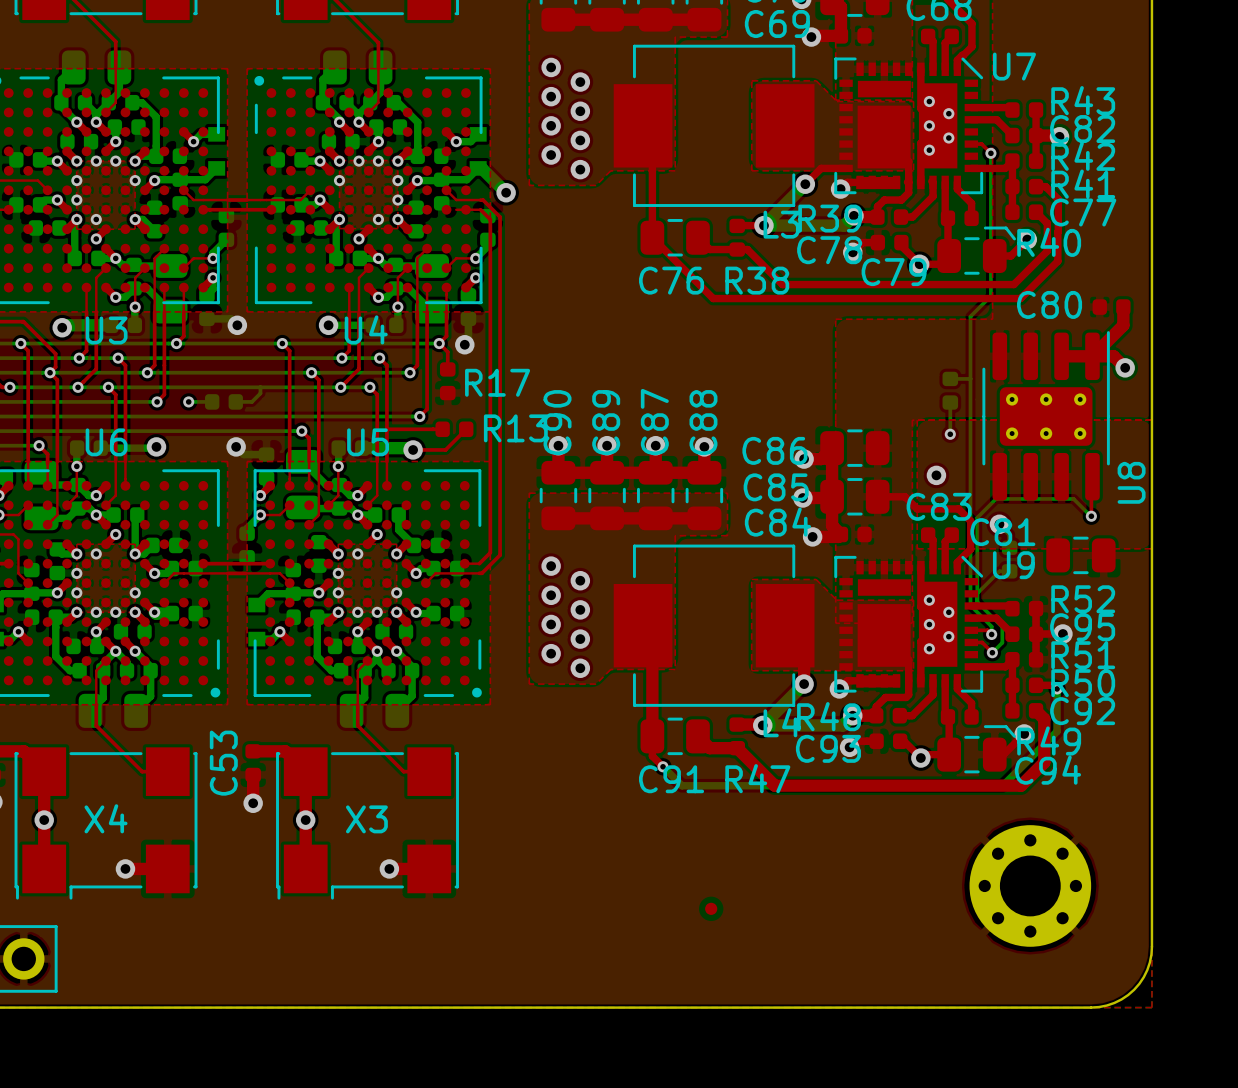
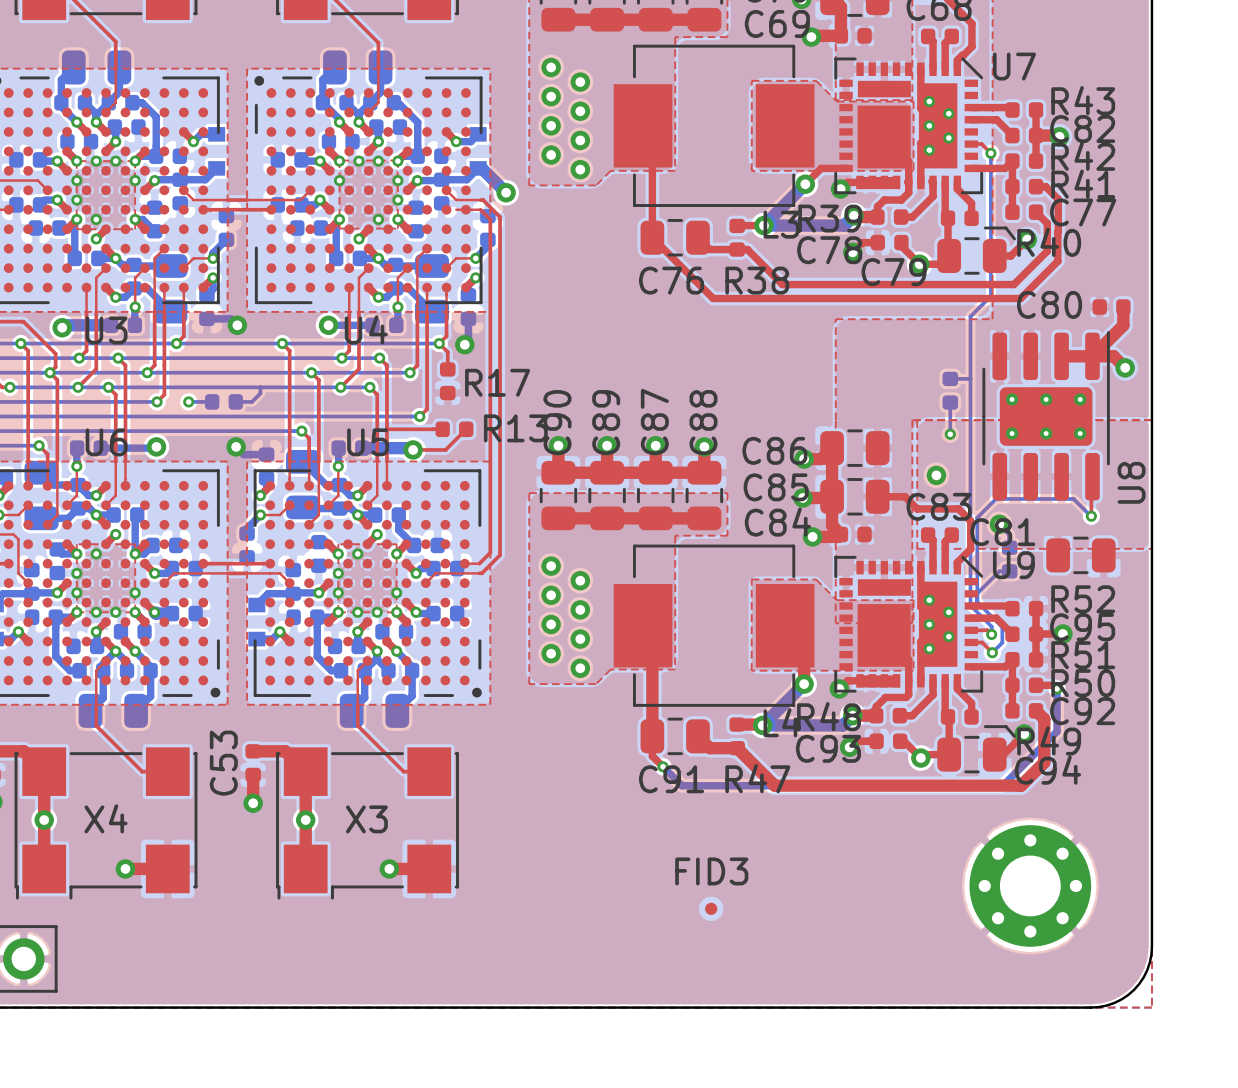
FID3 name: none -> FID3 (711, 871)

